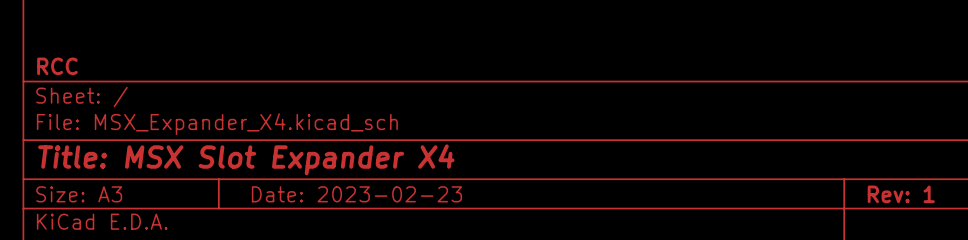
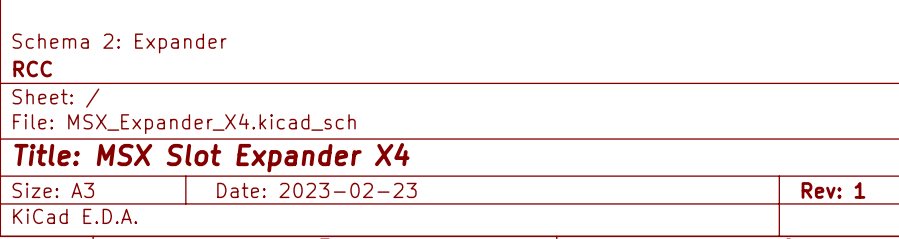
title block: none -> Schema 2: Expander (119, 43)

